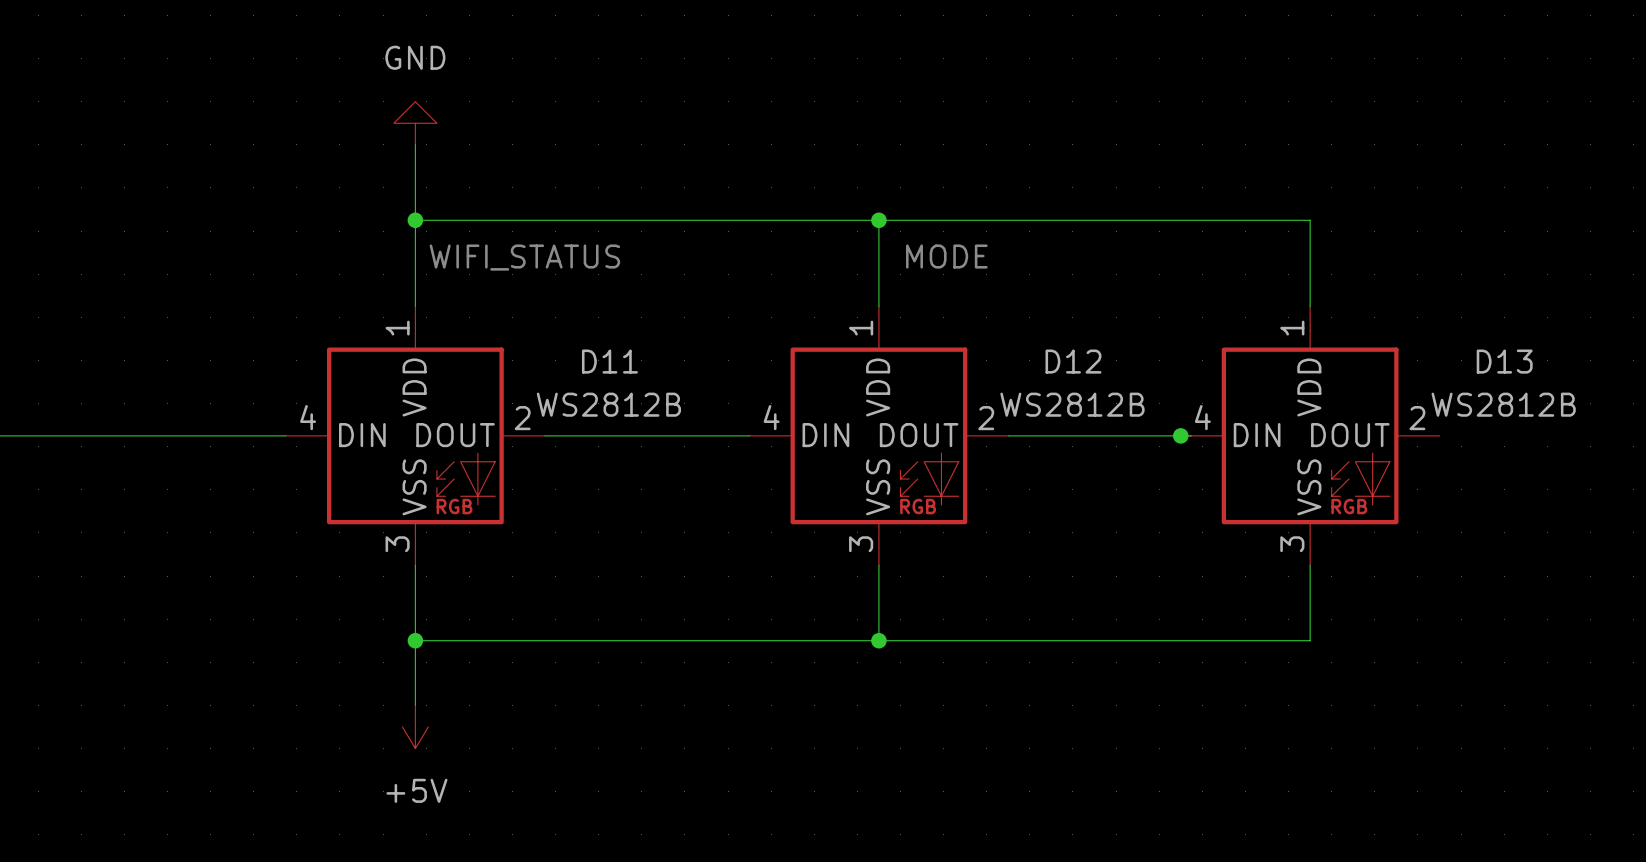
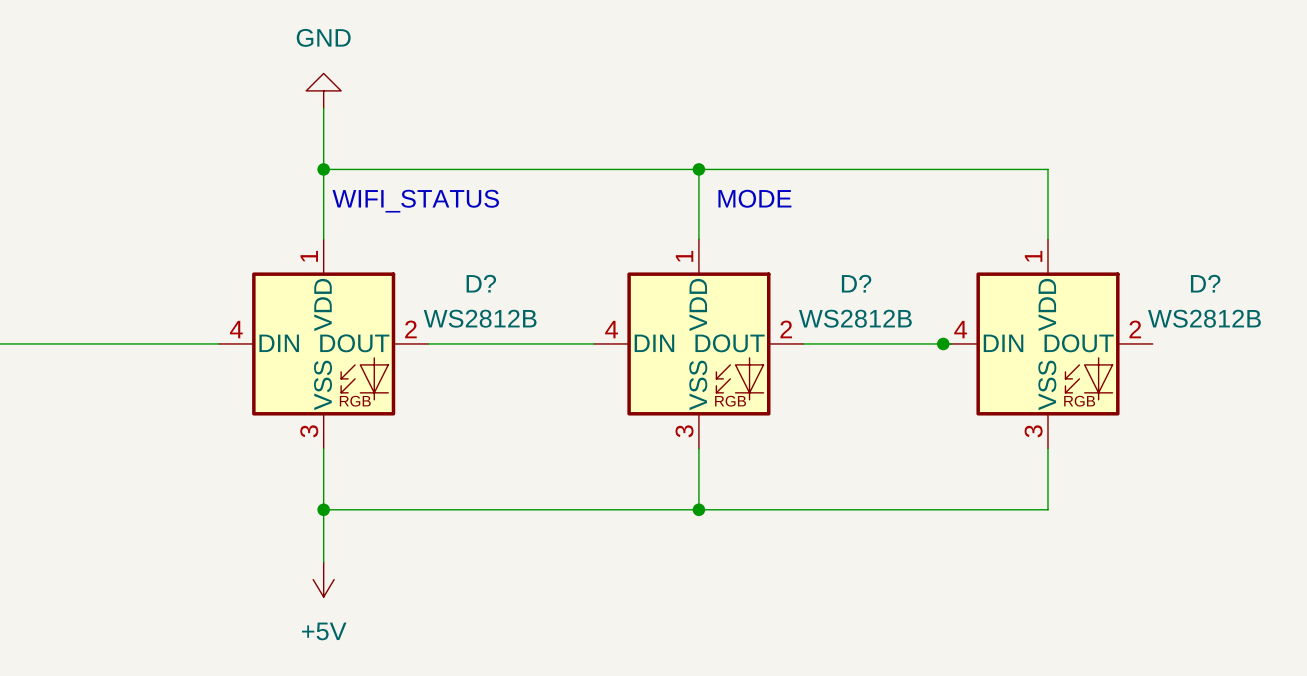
D11 name: D11 (609, 361) -> D? (481, 283)
D12 name: D12 (1073, 361) -> D? (856, 283)
D13 name: D13 (1504, 361) -> D? (1205, 283)

